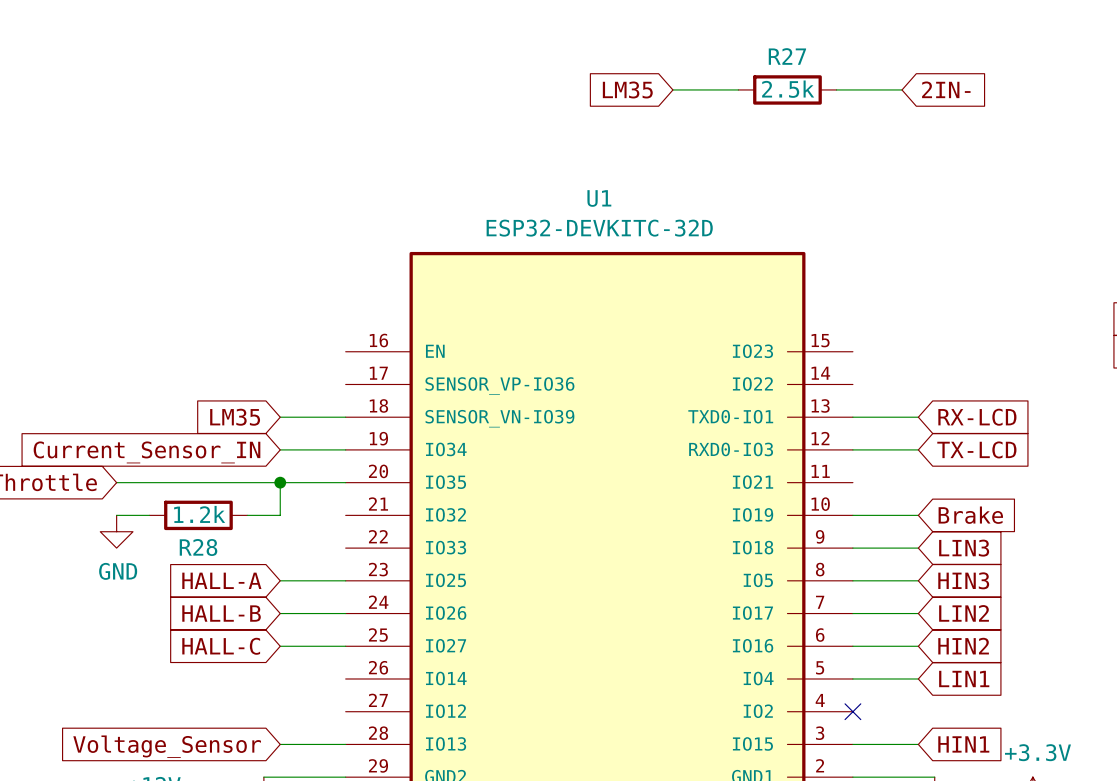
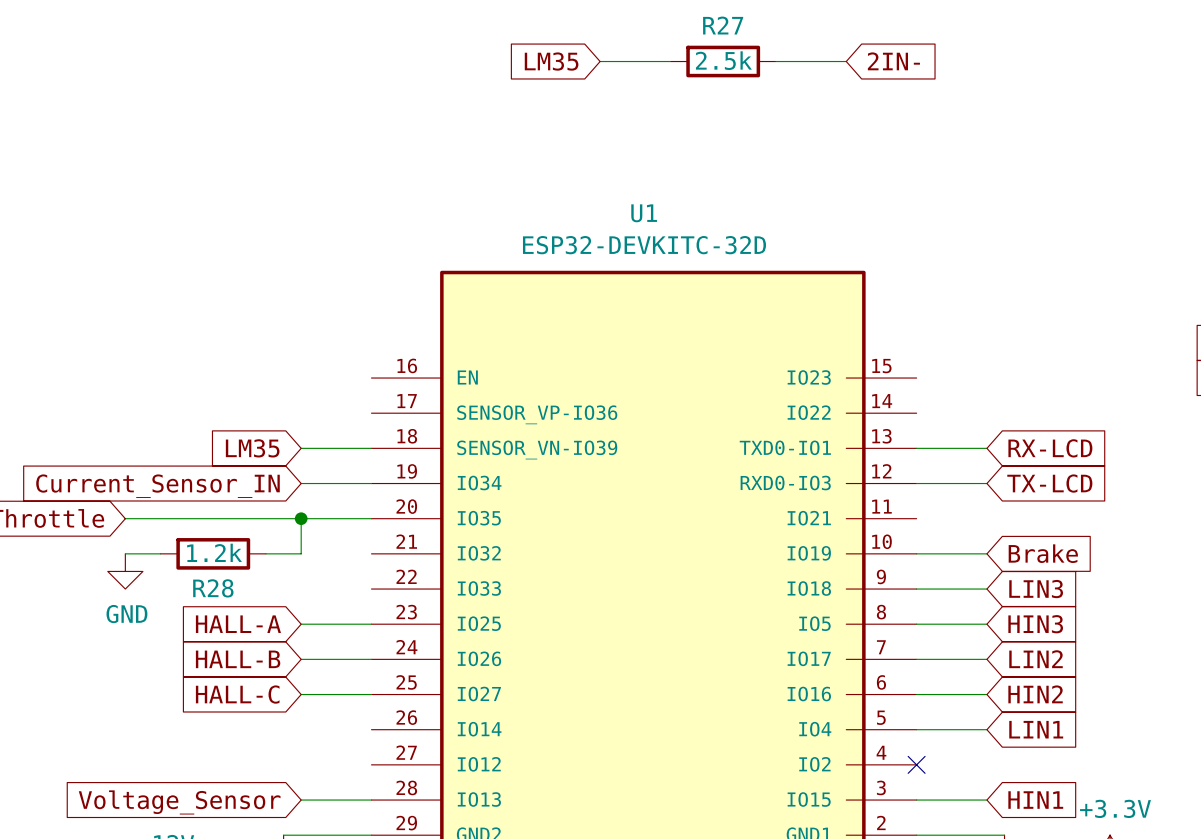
global label position: LM35 (627, 89) -> LM35 (551, 61)
wire: (672, 89) (738, 89) -> (775, 61) (846, 61)
R27 position: (787, 89) -> (723, 61)
wire: (836, 89) (902, 89) -> (600, 61) (670, 61)
global label position: 2IN- (946, 89) -> 2IN- (893, 61)

